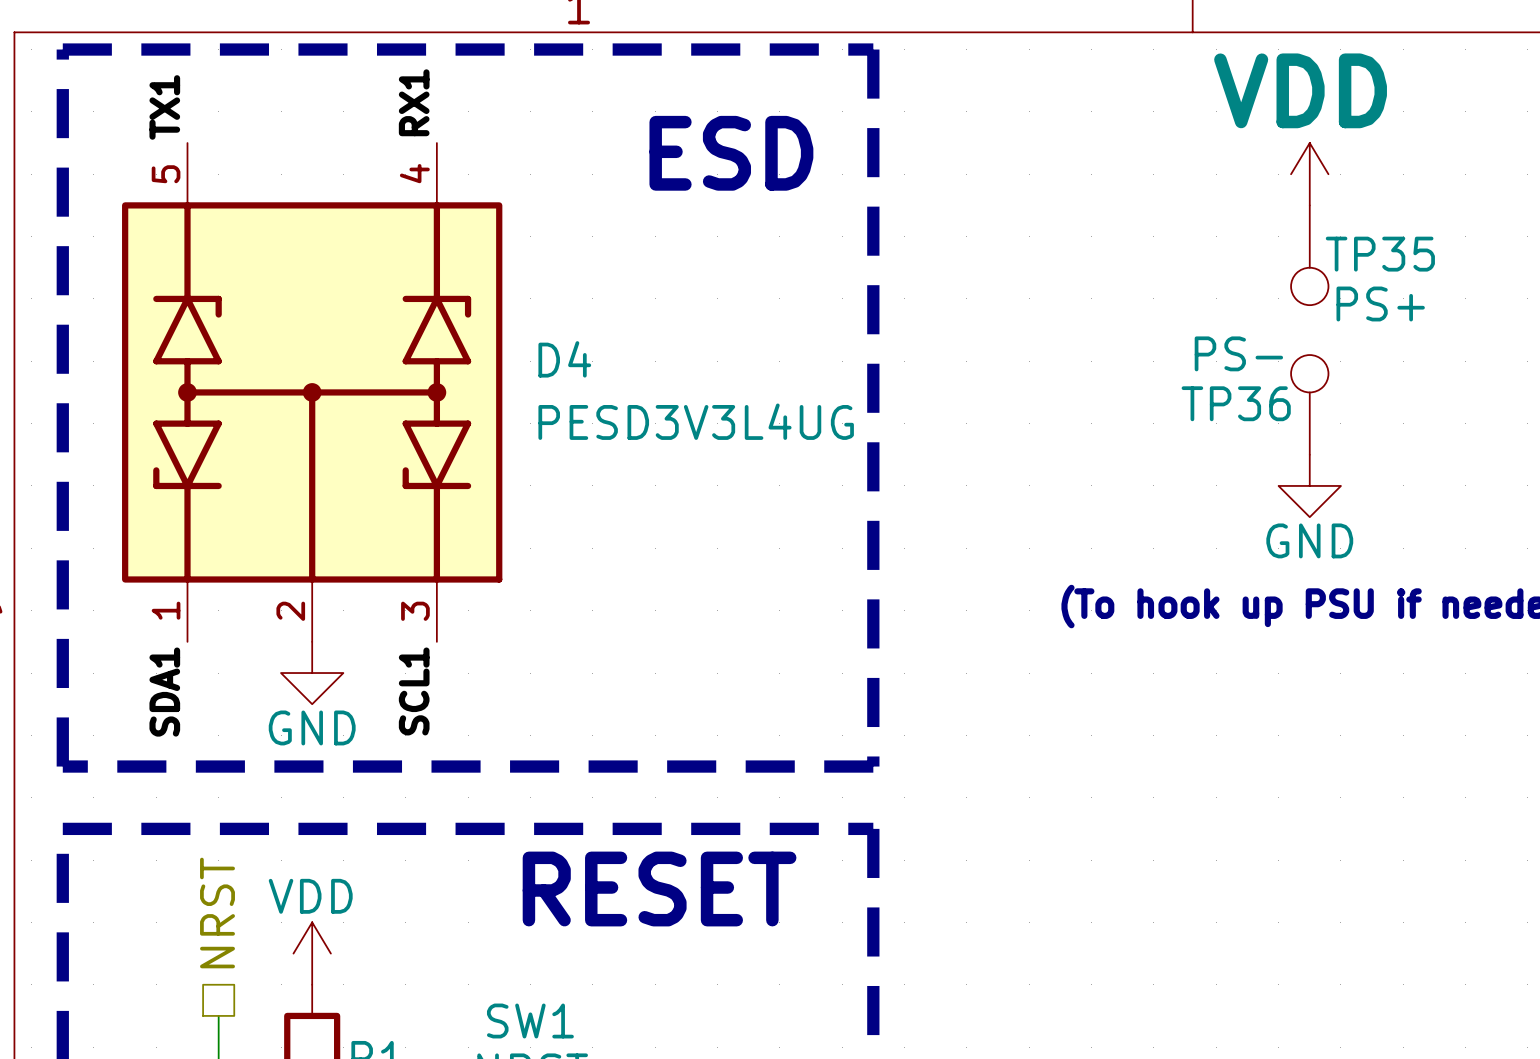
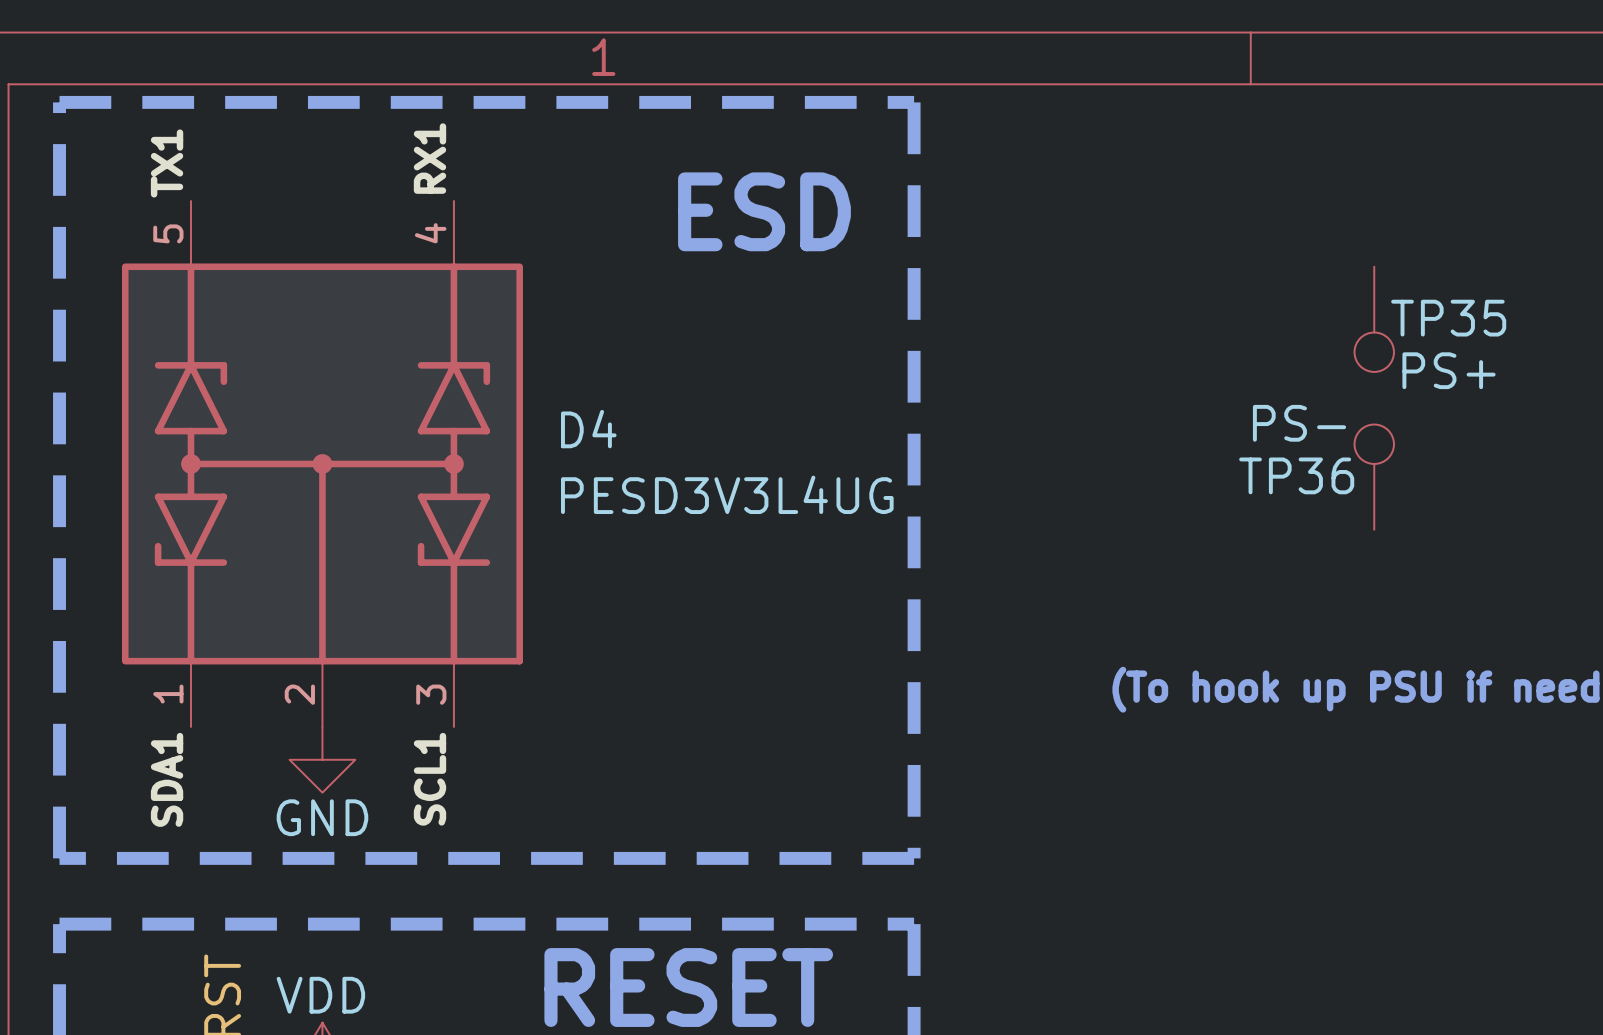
power symbol: VDD (1309, 174) -> none
power symbol: GND (1309, 485) -> none

